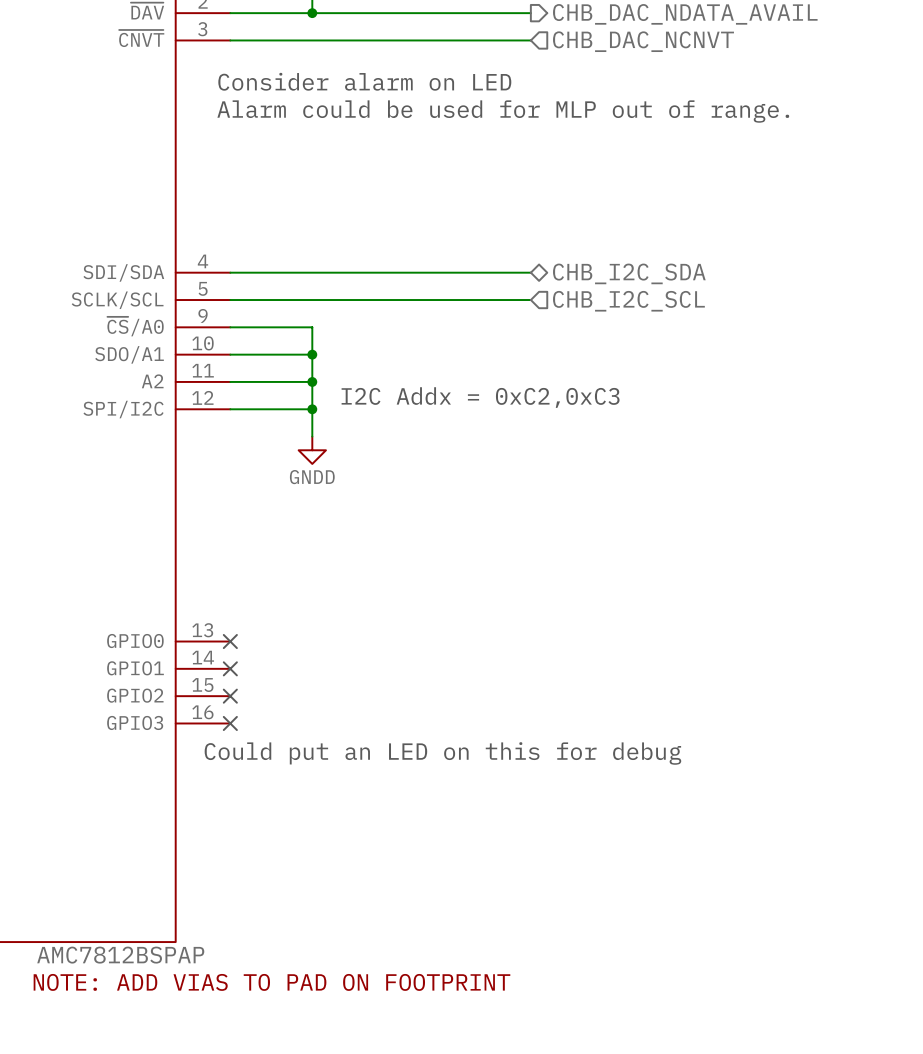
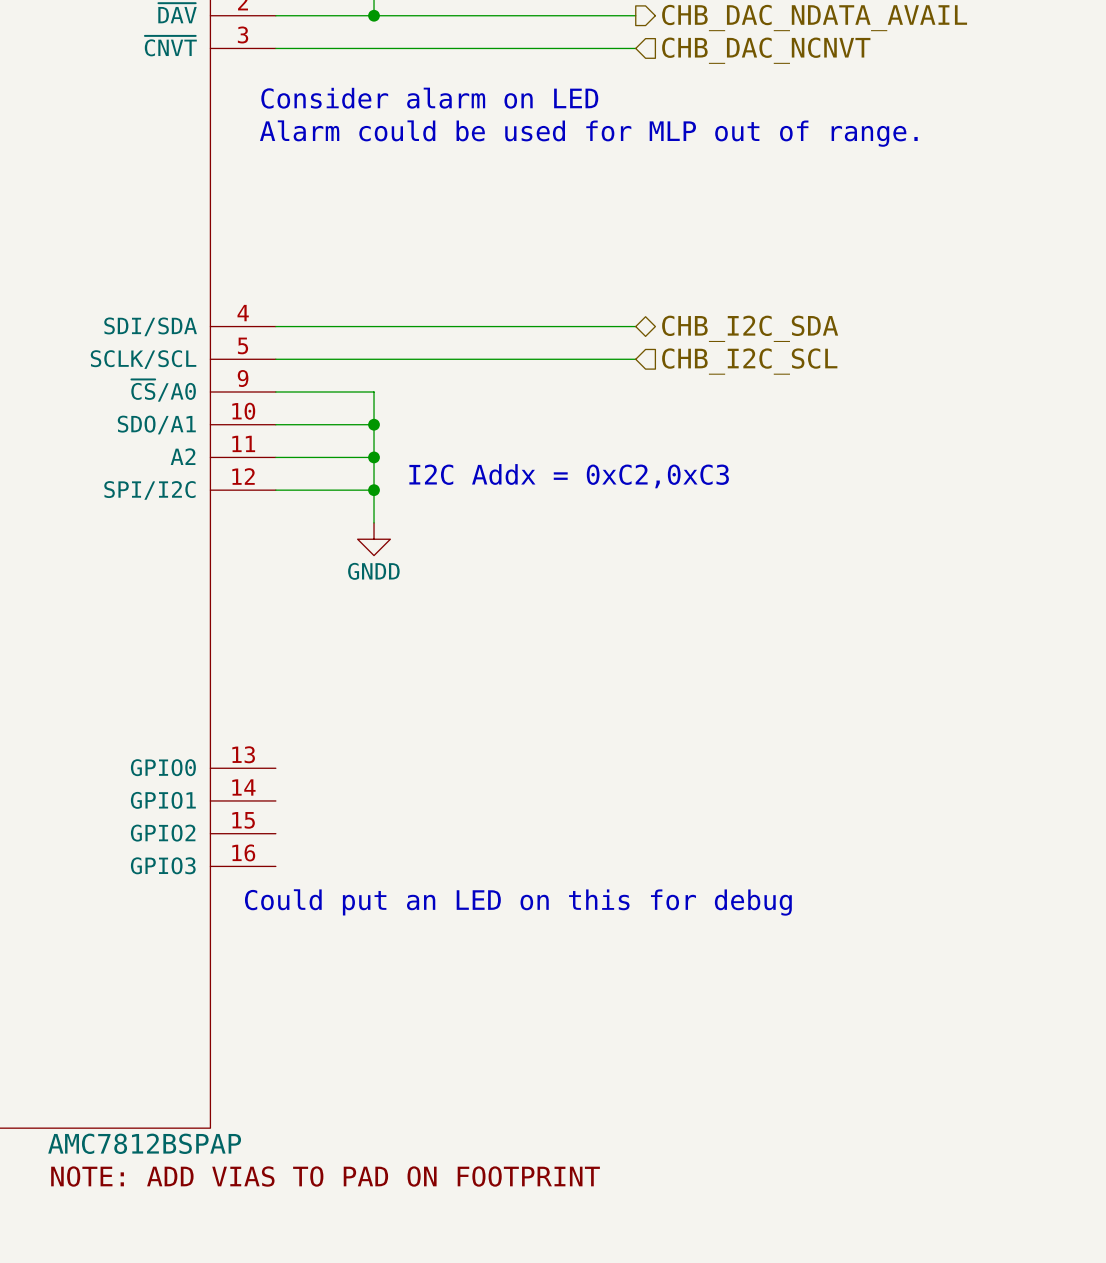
no-connect mark: (230, 641) -> none
no-connect mark: (230, 668) -> none
no-connect mark: (230, 696) -> none
no-connect mark: (230, 723) -> none

